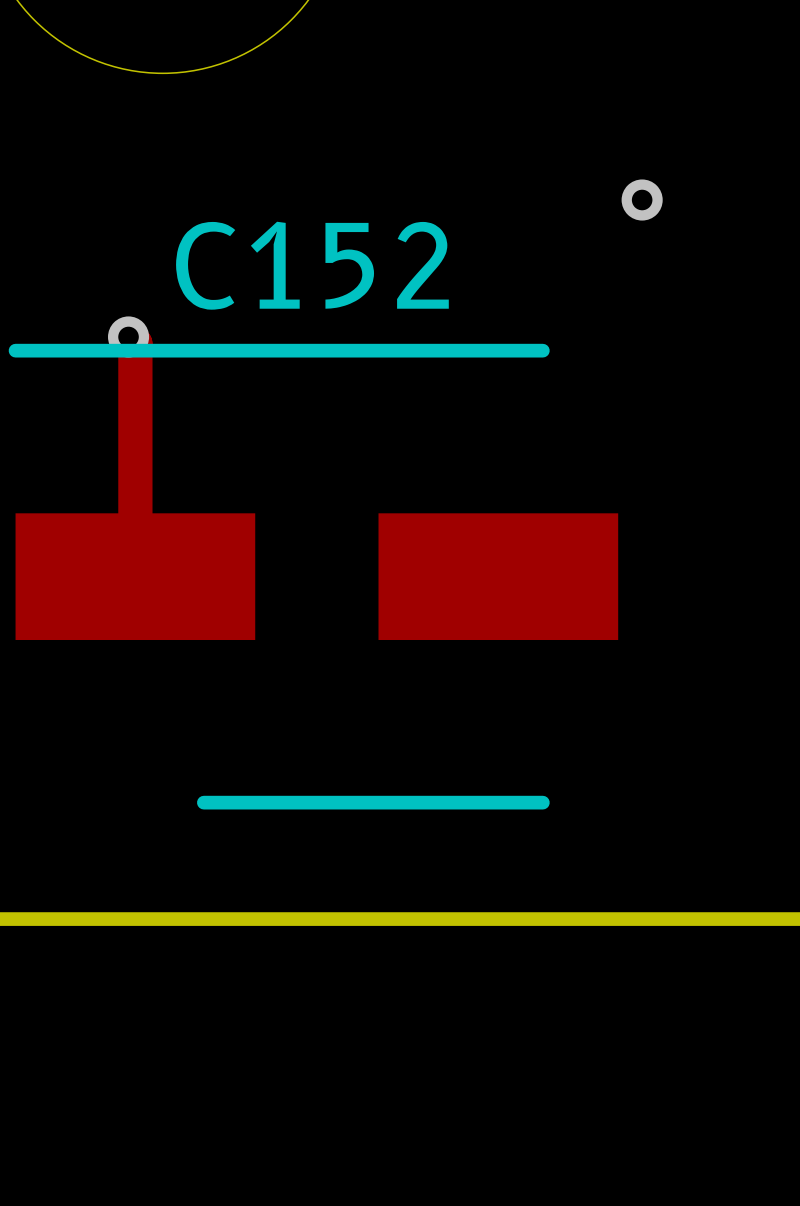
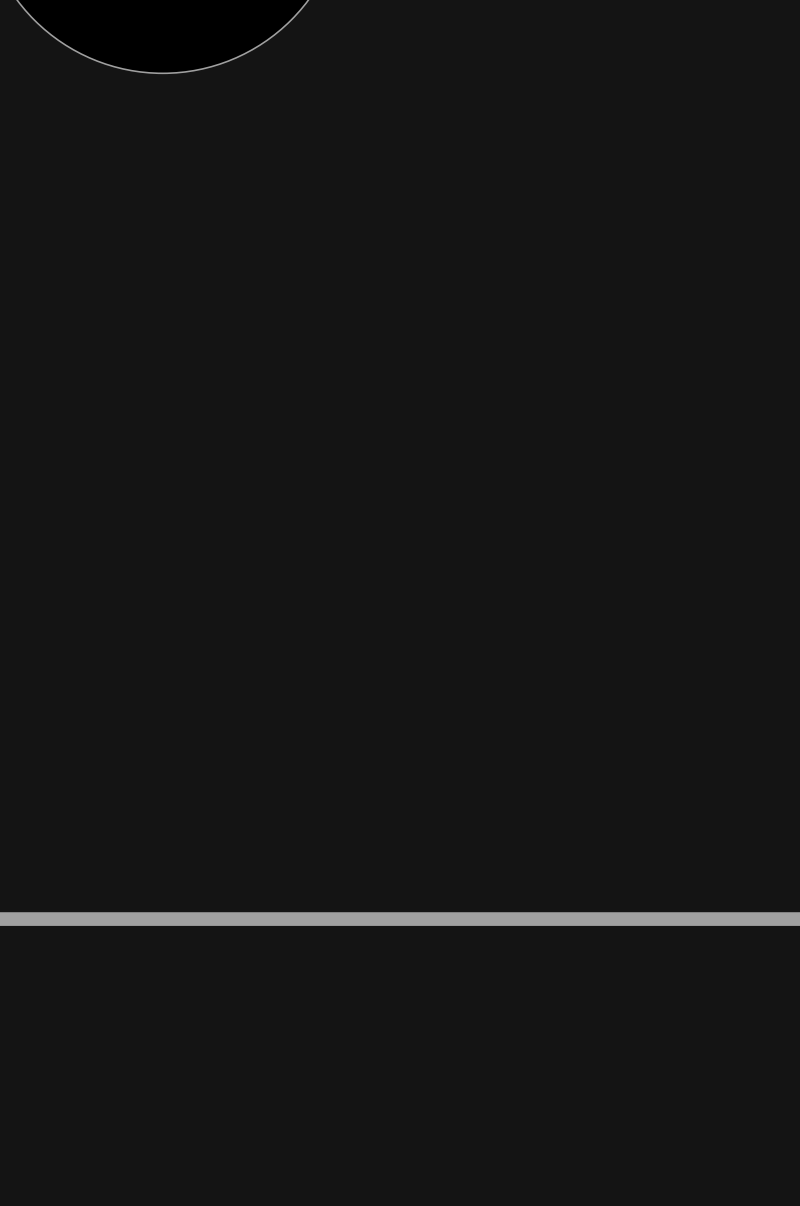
via: (642, 200) -> none
track: (128, 336) (135, 343) (135, 576) -> none
via: (128, 336) -> none
C152: (313, 576) -> none

